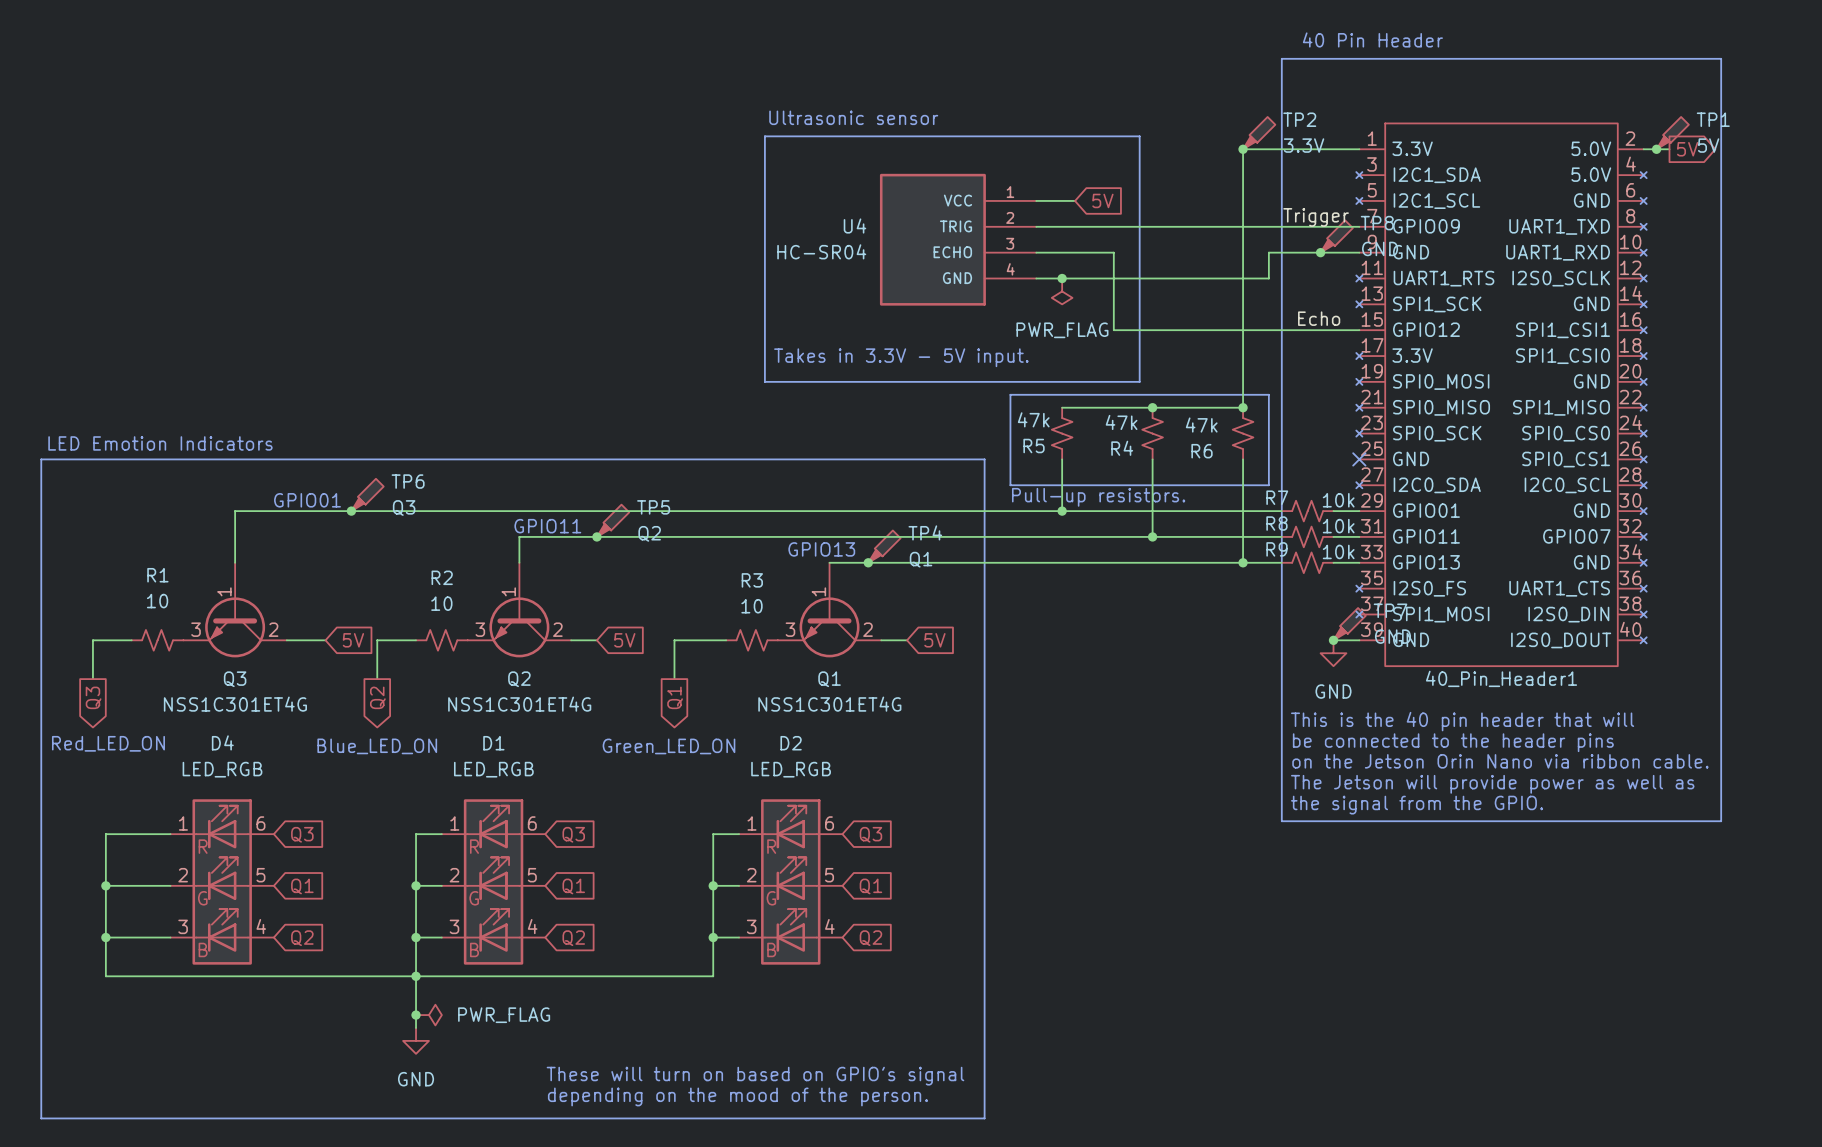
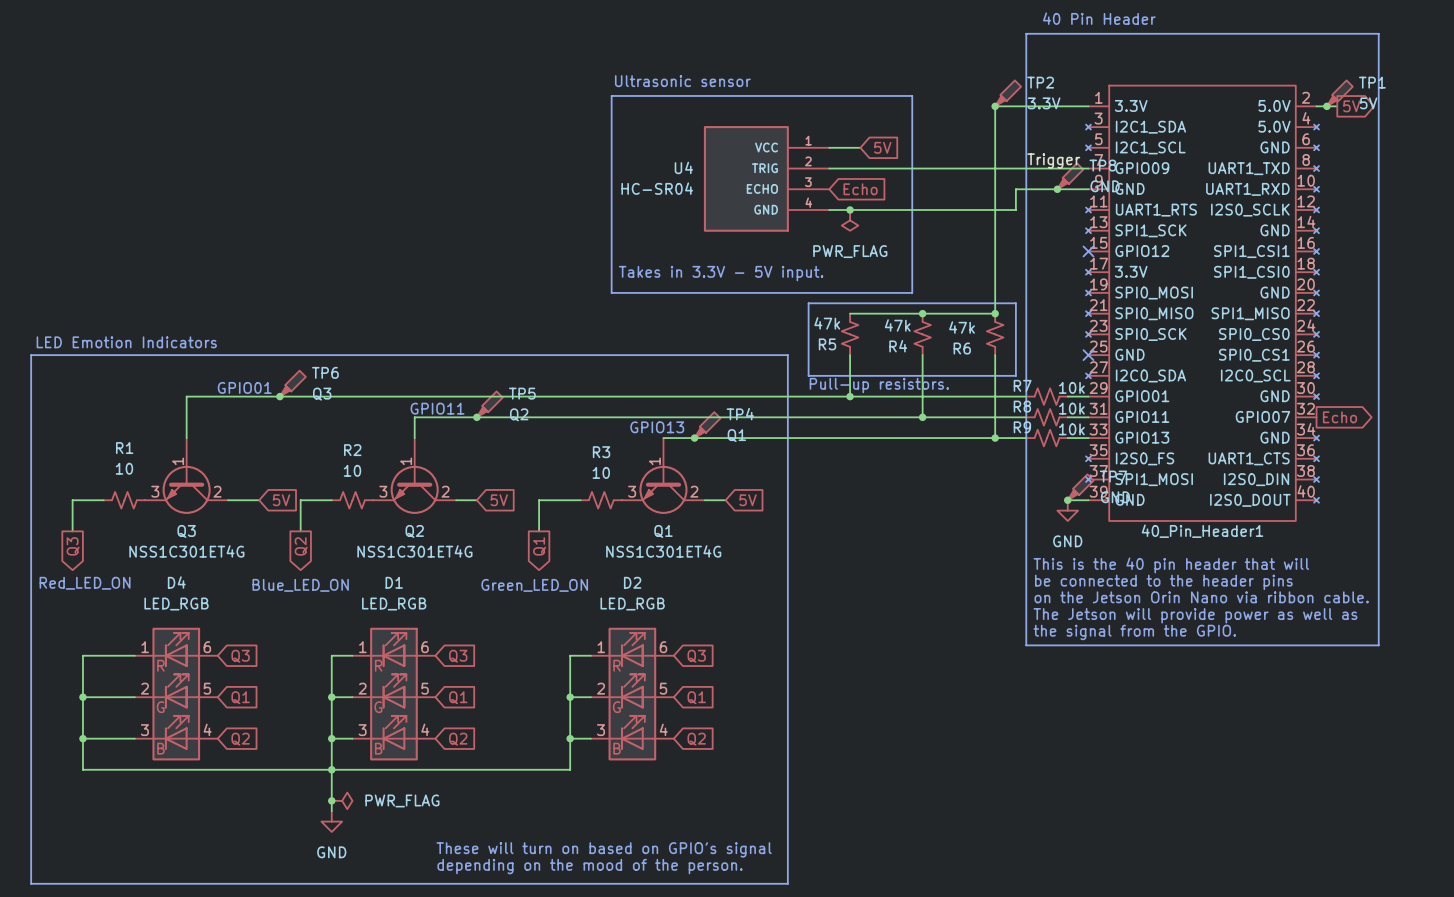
40_Pin_Header1 symbol: [1356, 123, 1647, 667] -> [1086, 85, 1319, 521]
wire: (1036, 252) (1113, 252) (1113, 330) (1359, 330) -> none
global label: none -> Echo (860, 189)
label: Echo (1319, 318) -> none
no-connect mark: none -> (1088, 251)
global label: none -> Echo (1339, 417)

